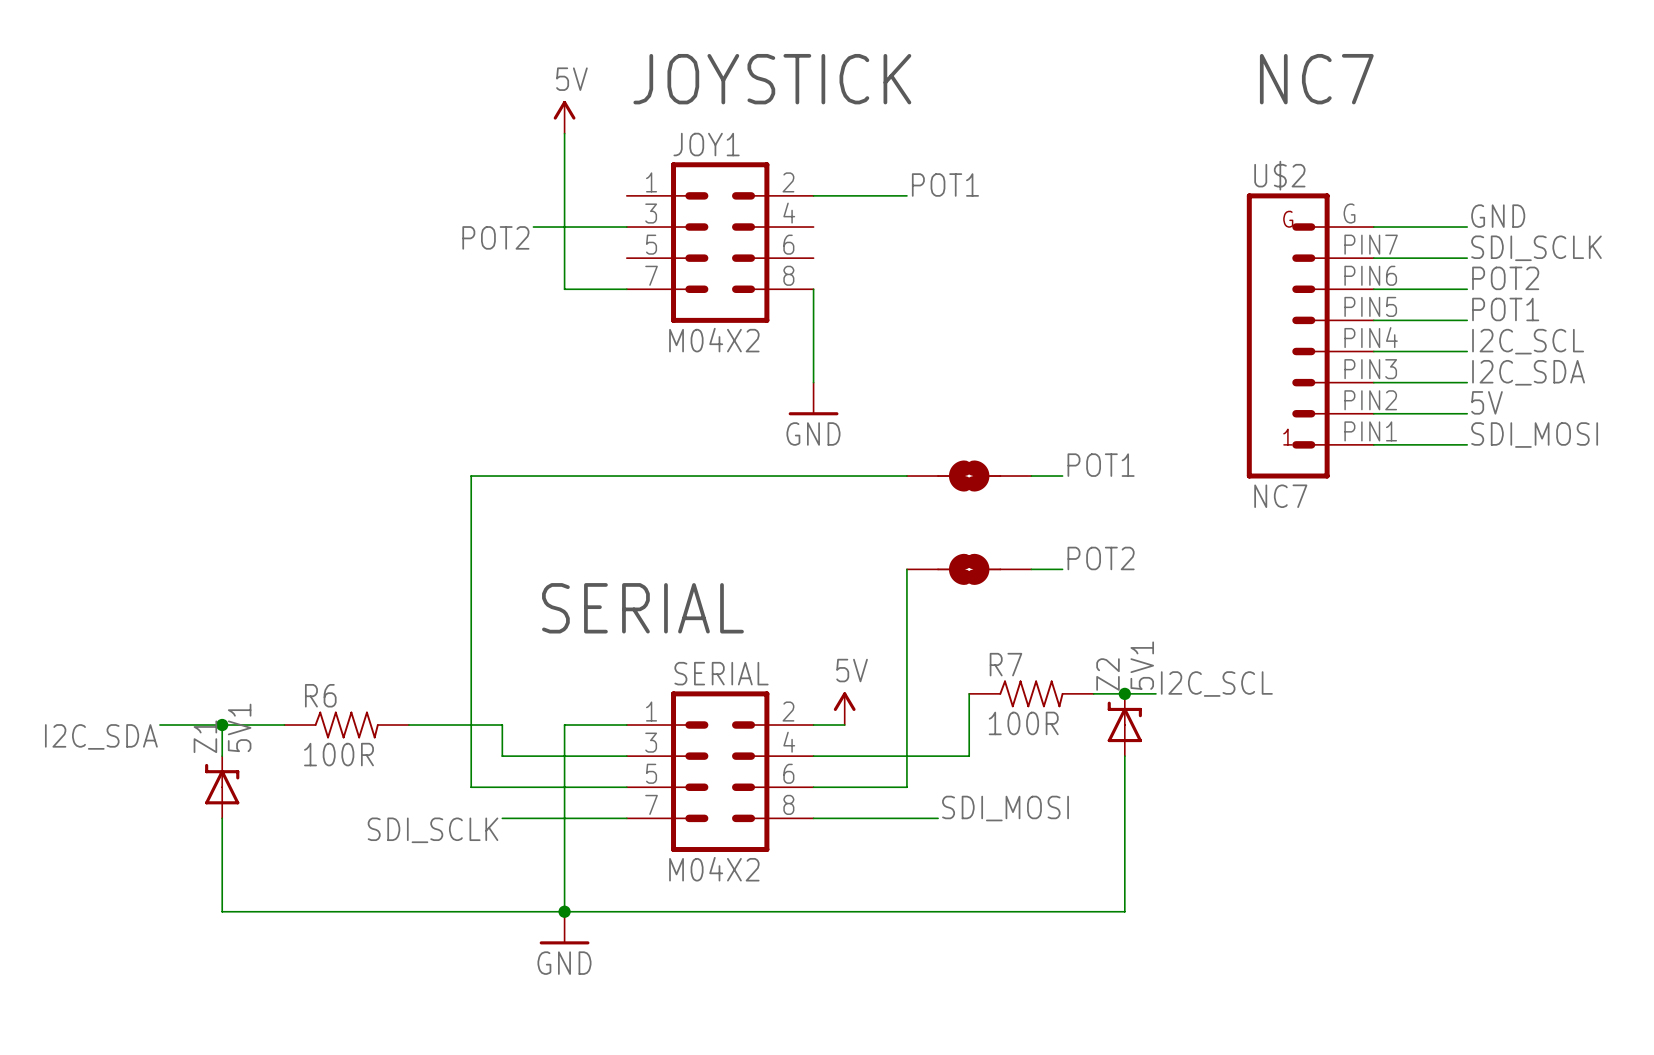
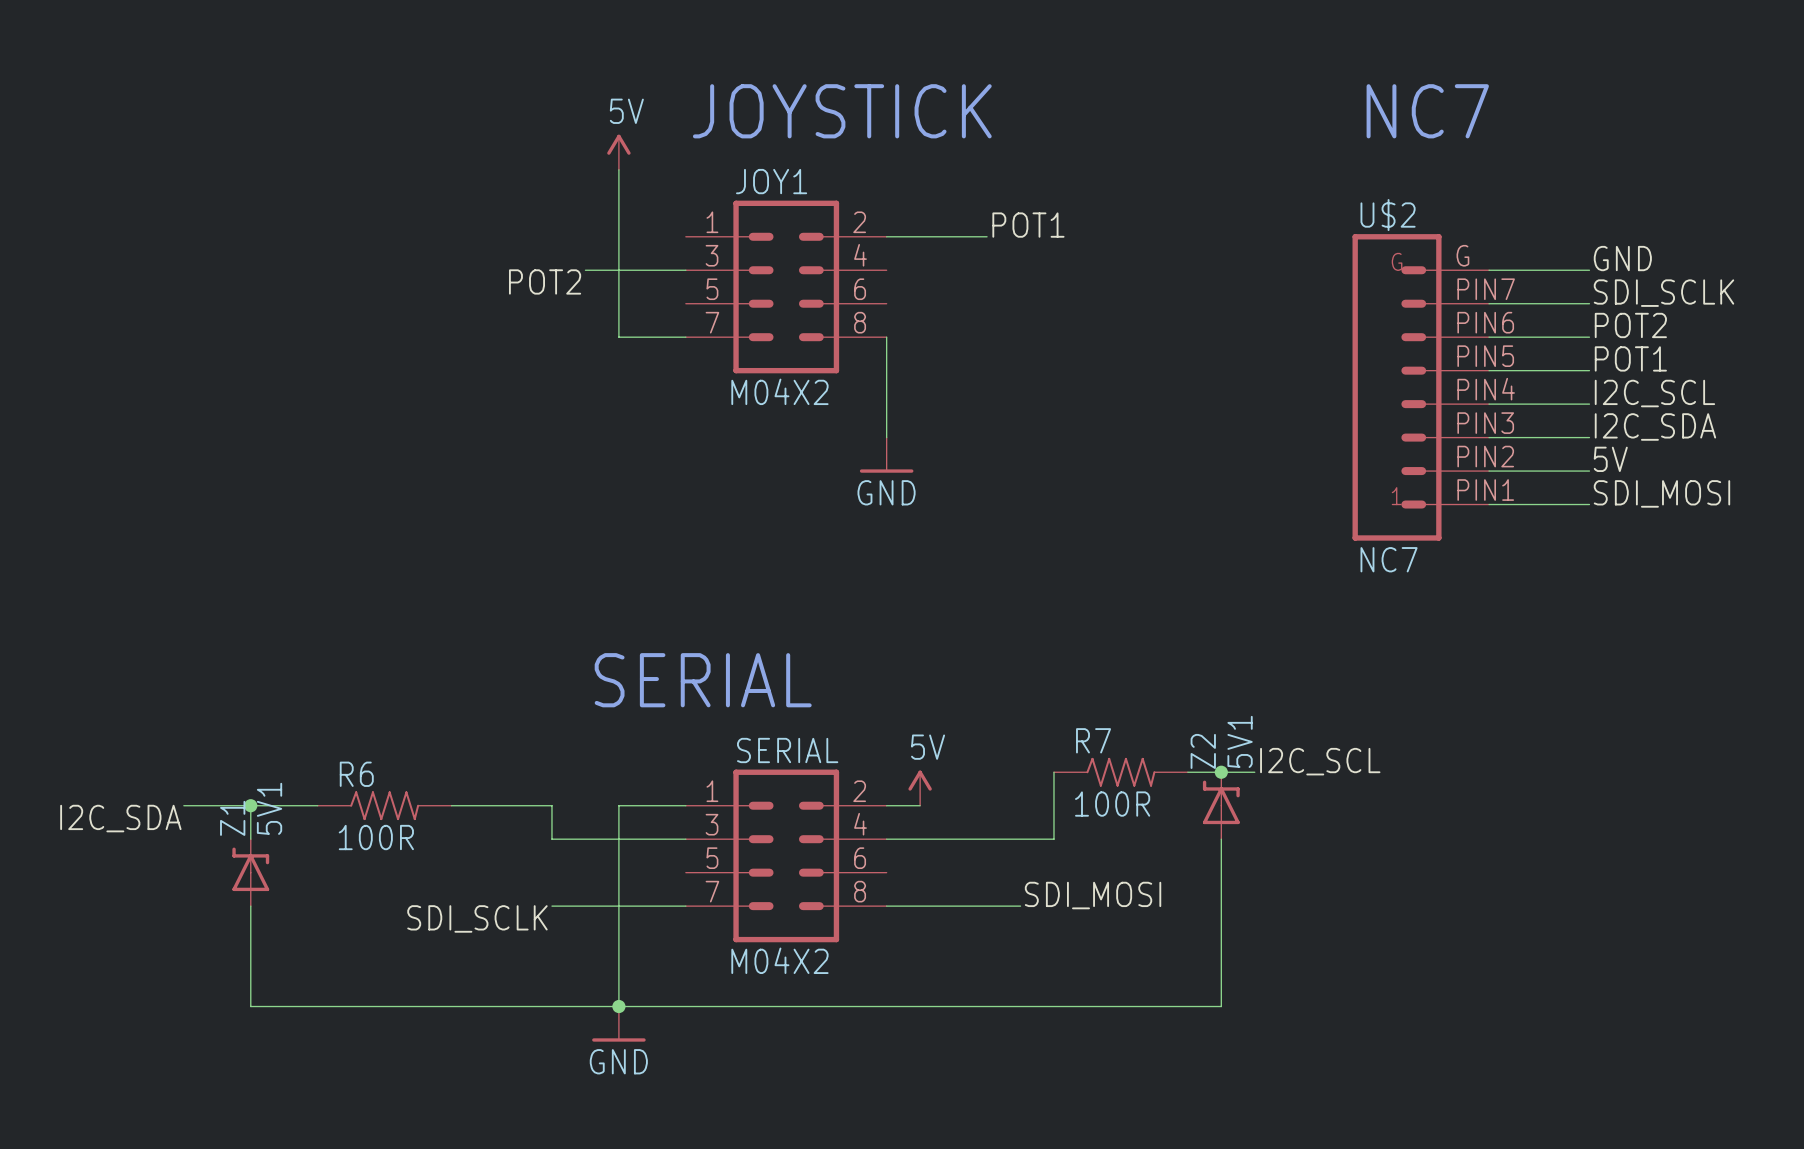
label: POT1 (1101, 465) -> none
wire: (906, 476) (471, 476) (471, 787) (626, 787) -> none
part: (969, 476) -> none
wire: (1031, 476) (1062, 476) -> none
label: POT2 (1101, 558) -> none
wire: (906, 569) (906, 787) (813, 787) -> none
part: (969, 569) -> none
wire: (1031, 569) (1062, 569) -> none

